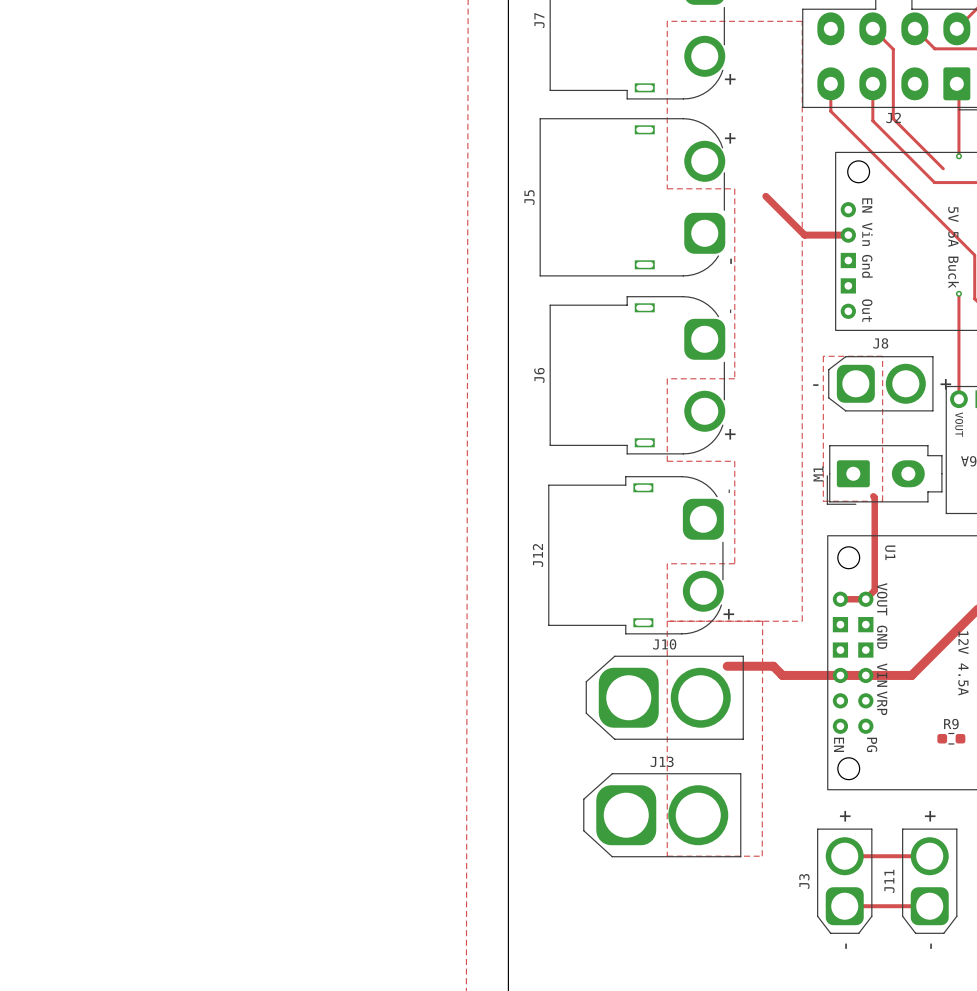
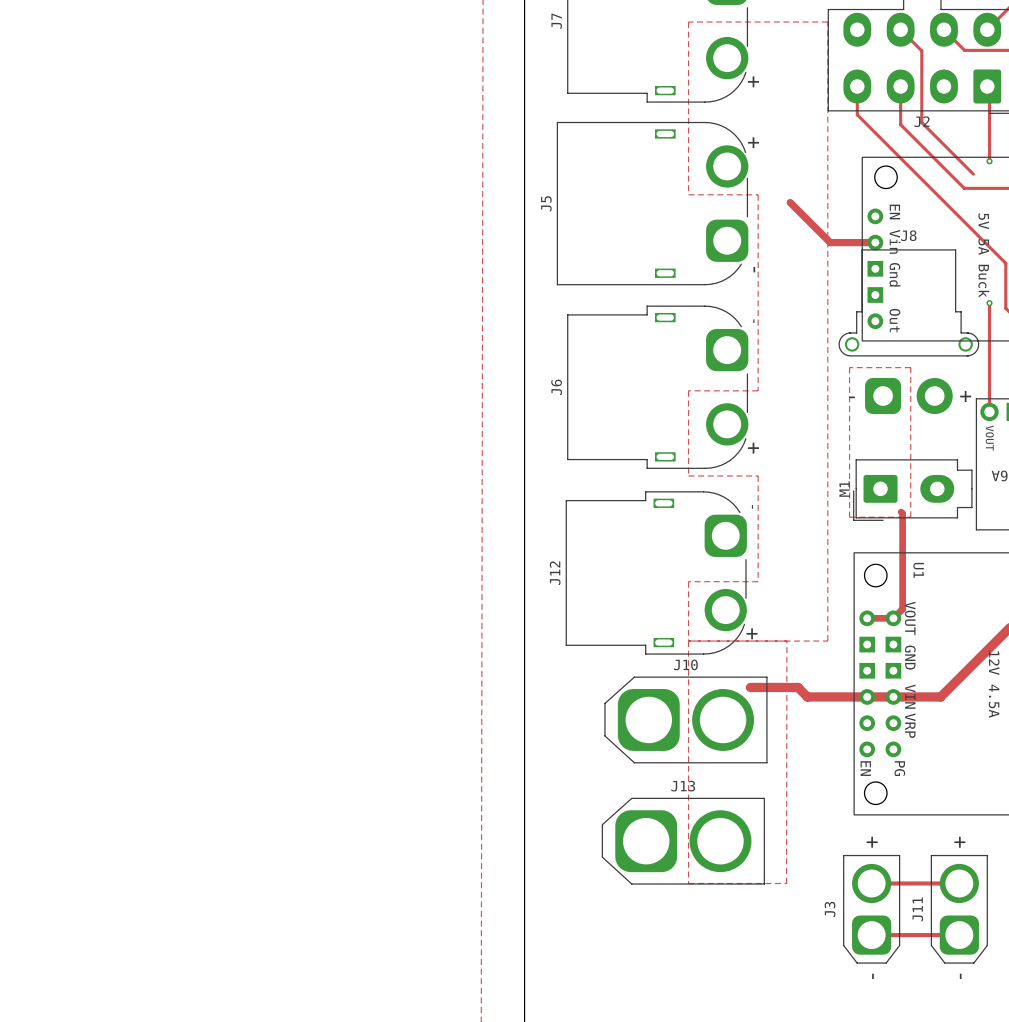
J8 name position: J8 (880, 343) -> J8 (908, 235)
J8 footprint: [828, 356, 934, 412] -> [838, 249, 980, 415]
R9: (951, 738) -> none

